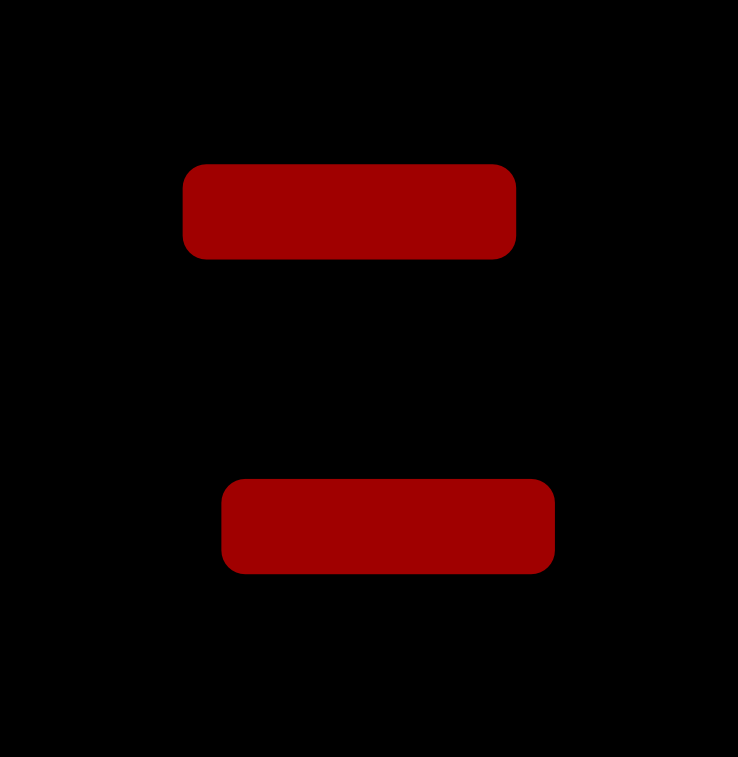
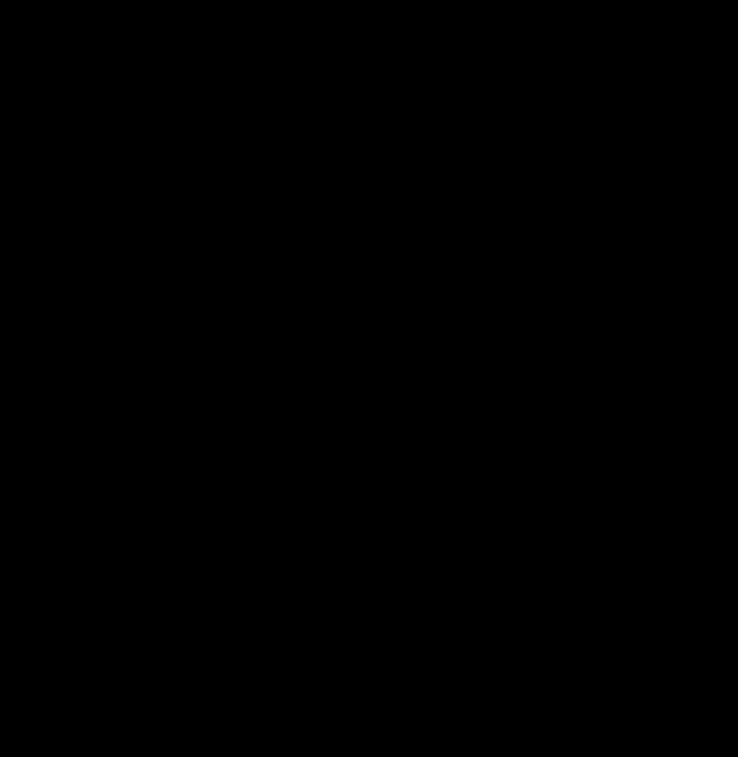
part: (349, 211) -> none
part: (388, 526) -> none

